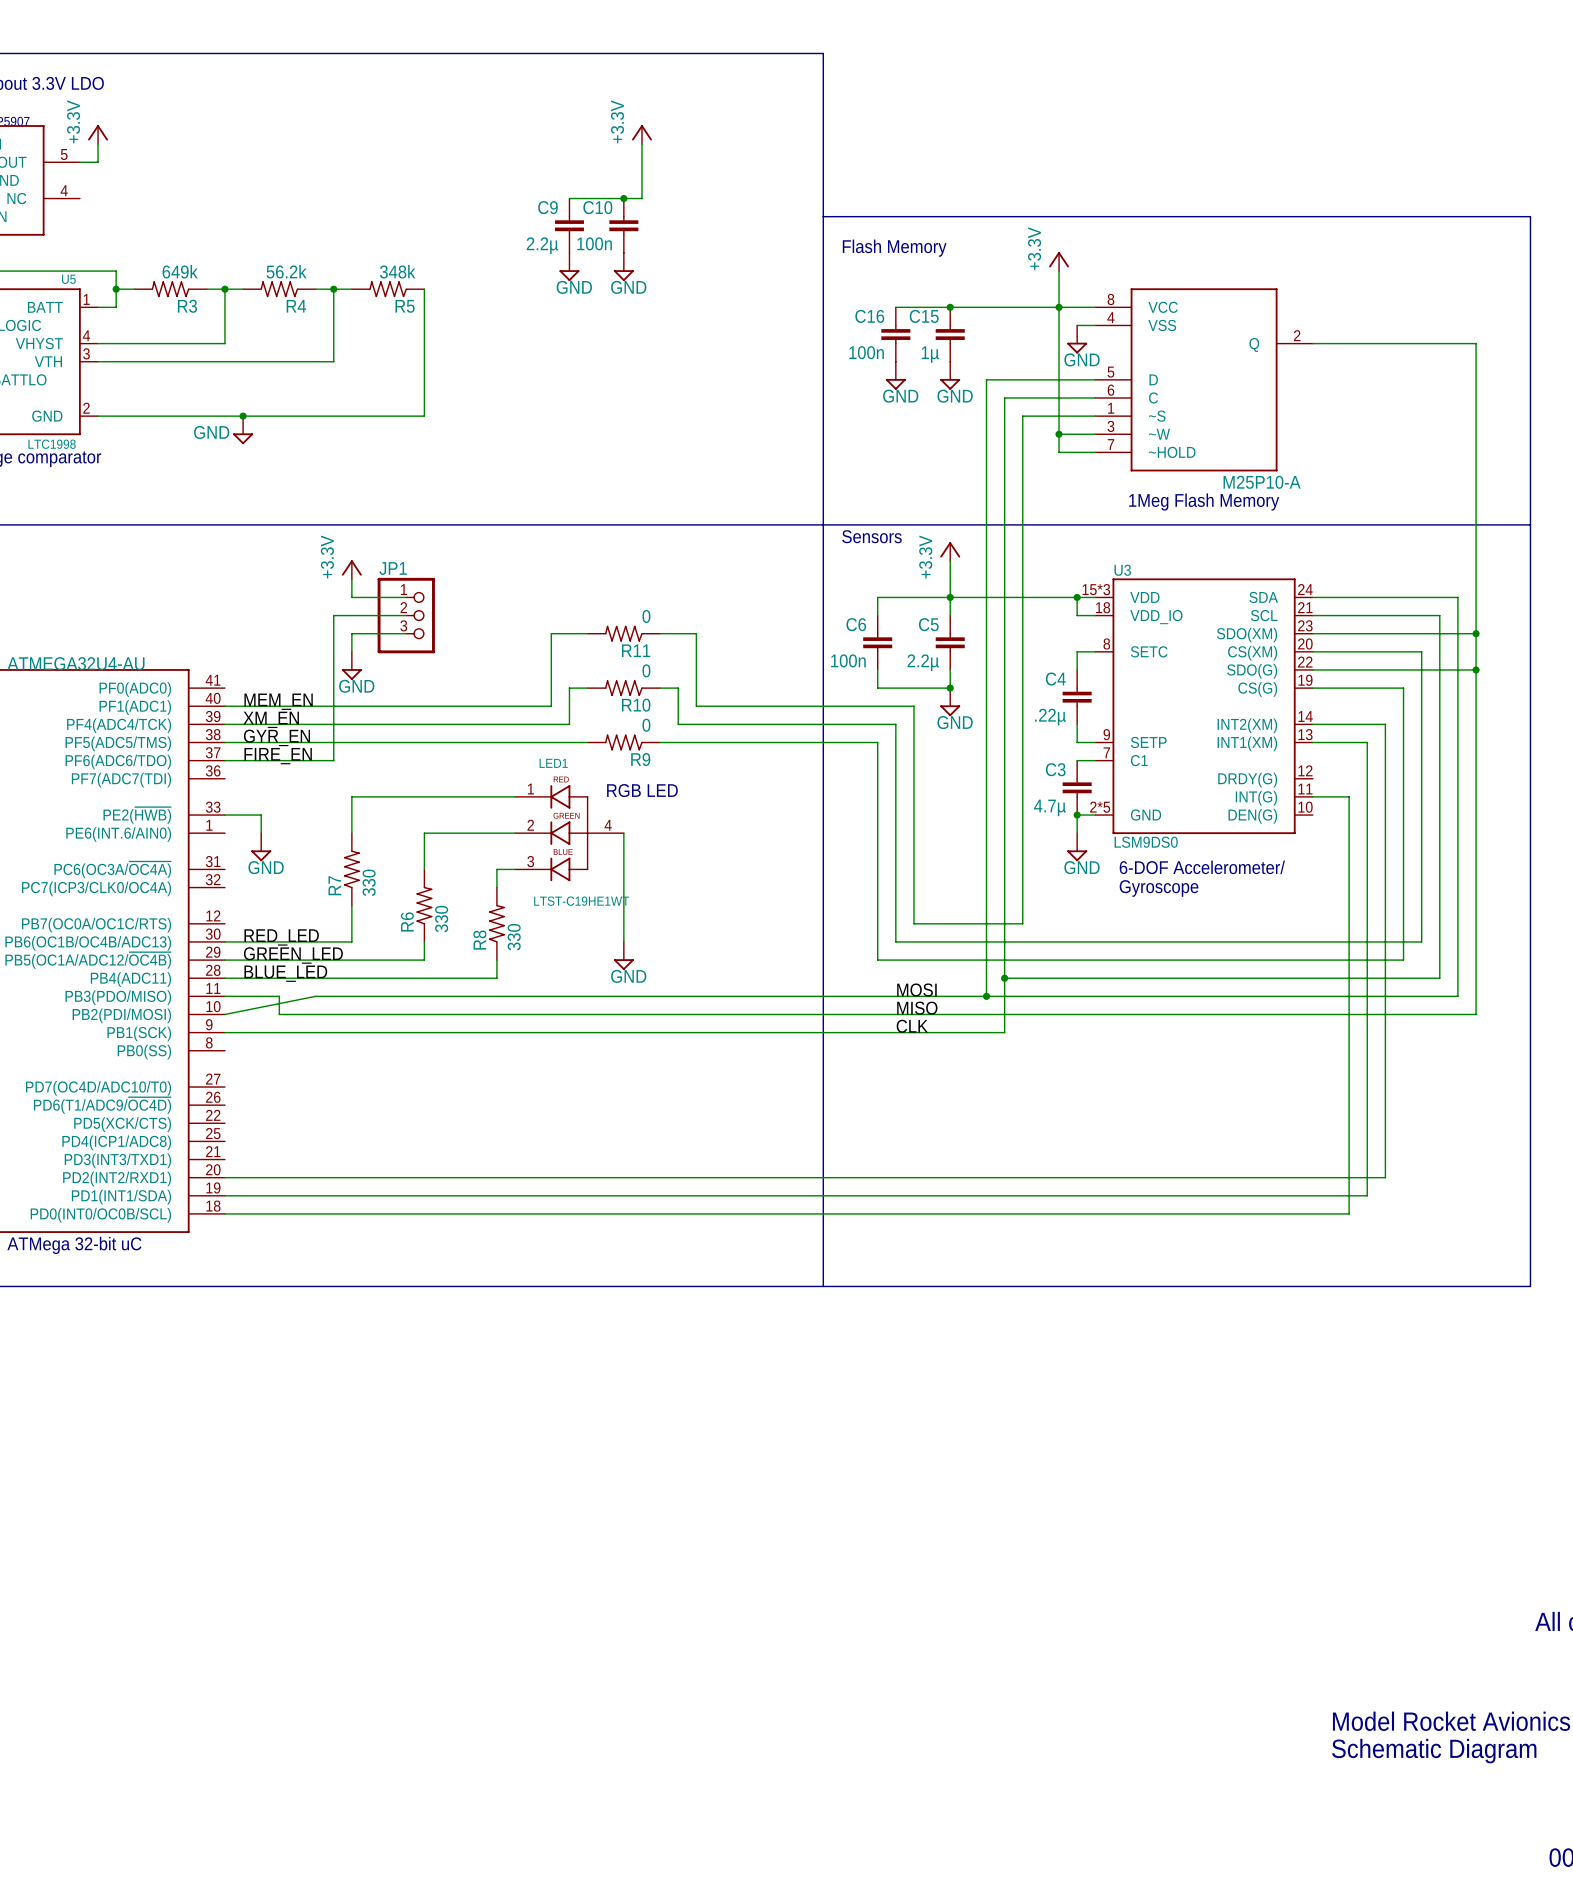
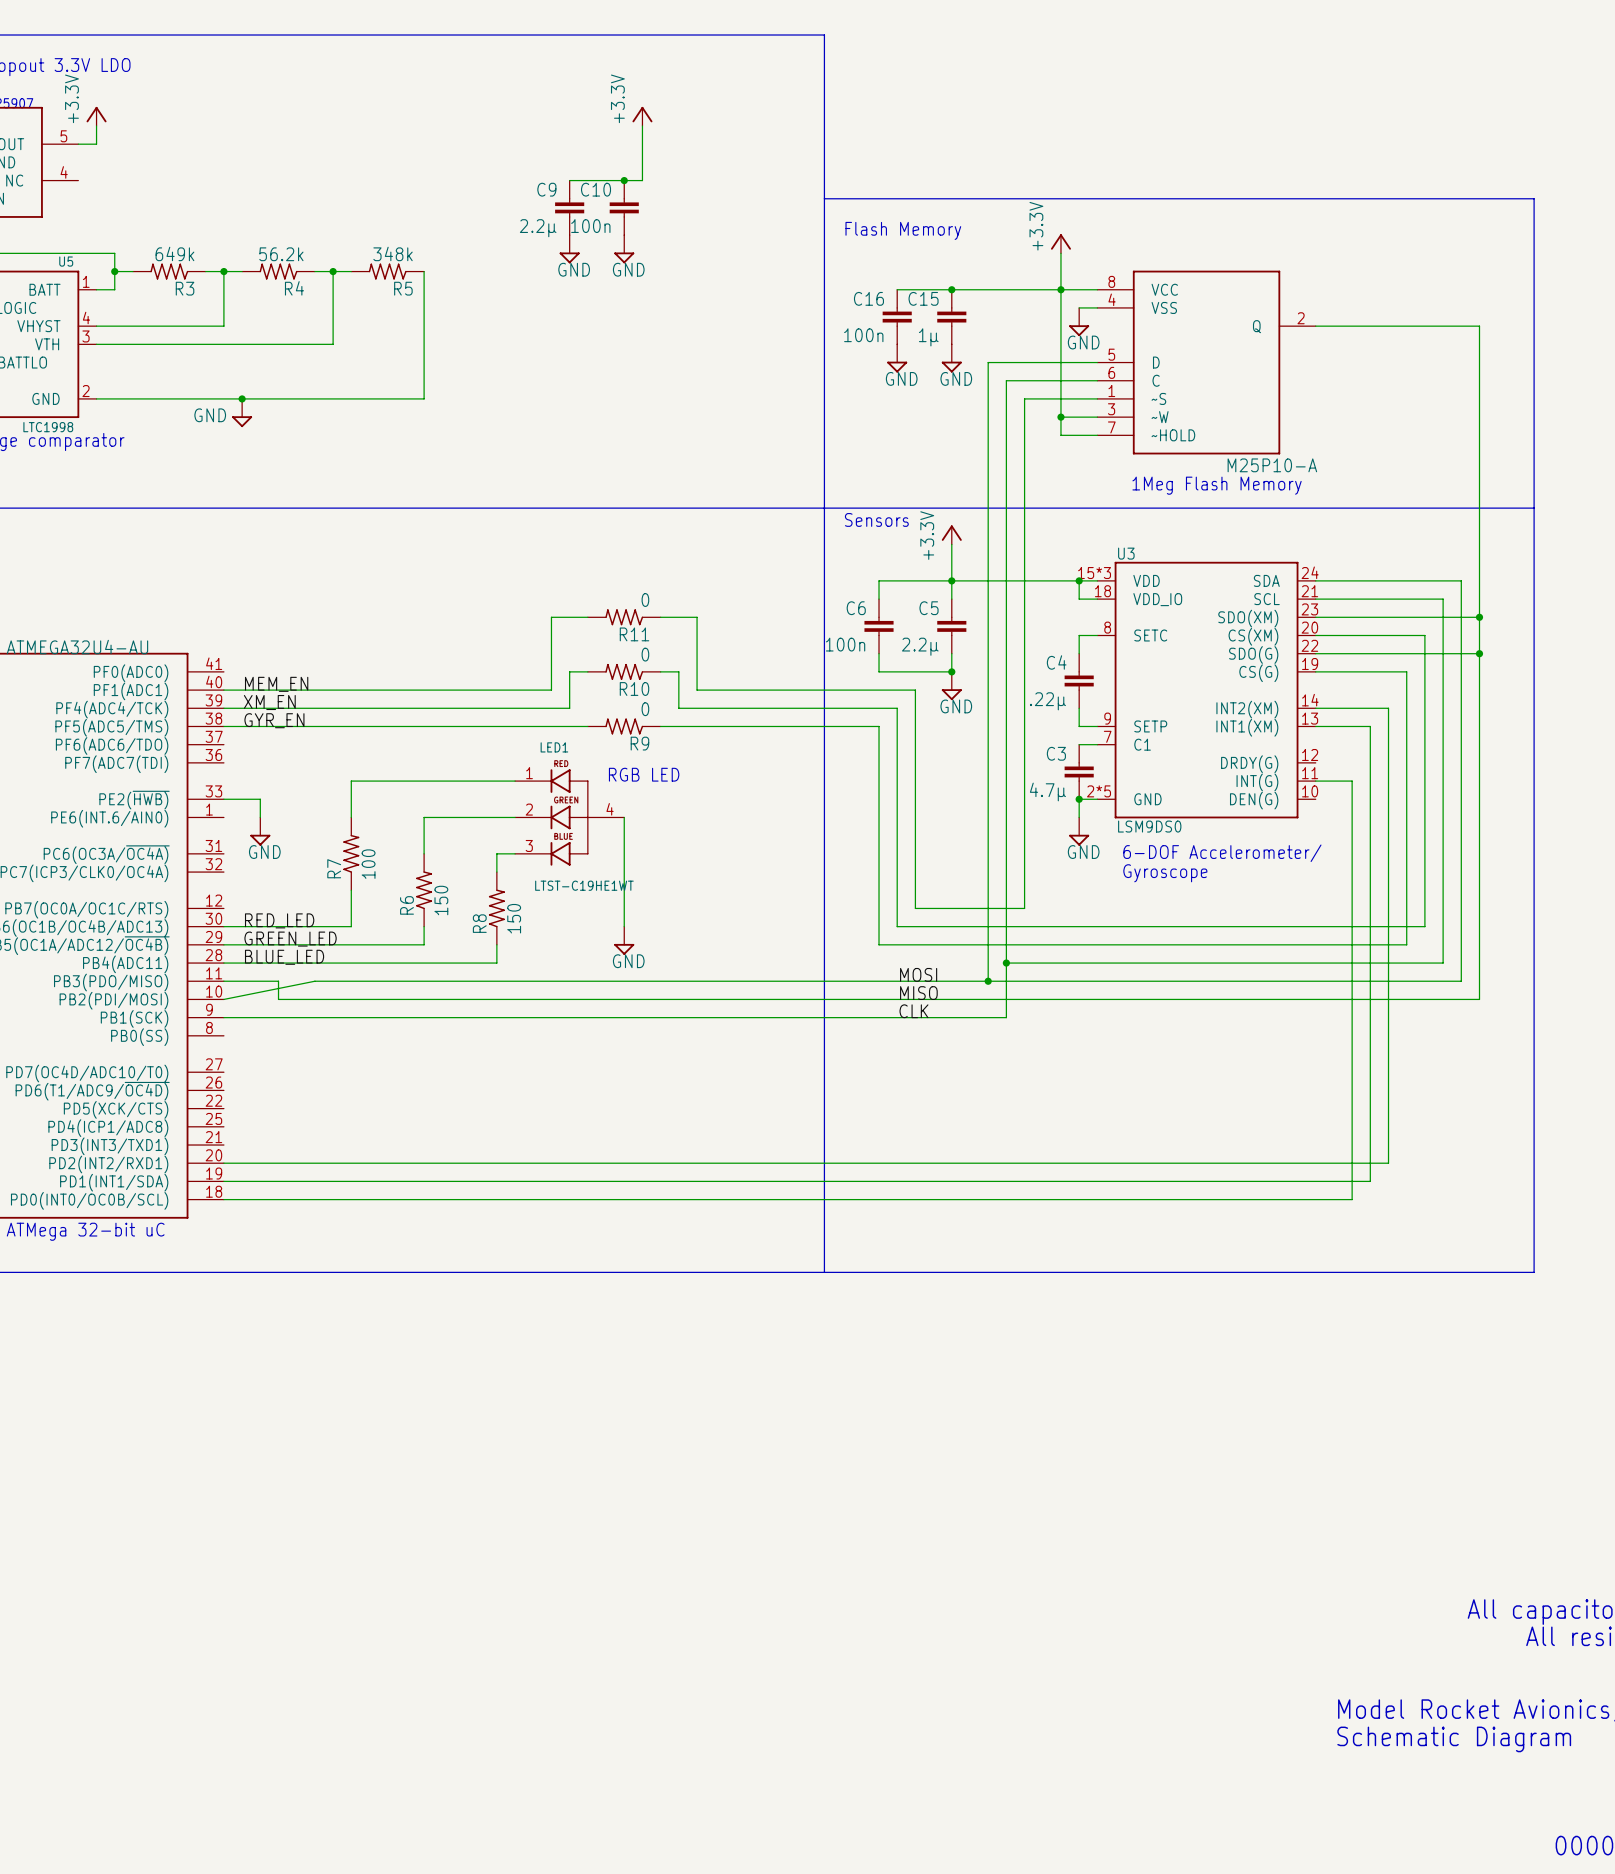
power symbol: +3.3V (351, 569) -> none
wire: (351, 579) (351, 597) (406, 597) -> none
wire: (406, 615) (333, 615) (333, 760) (224, 760) -> none
JP1: (406, 615) -> none
wire: (406, 633) (351, 633) (351, 651) -> none
power symbol: GND (351, 665) -> none
label: FIRE_EN (278, 756) -> none
R7 value: 330 (369, 882) -> 100 (368, 864)
R6 value: 330 (441, 919) -> 150 (441, 900)
R8 value: 330 (514, 937) -> 150 (514, 918)

